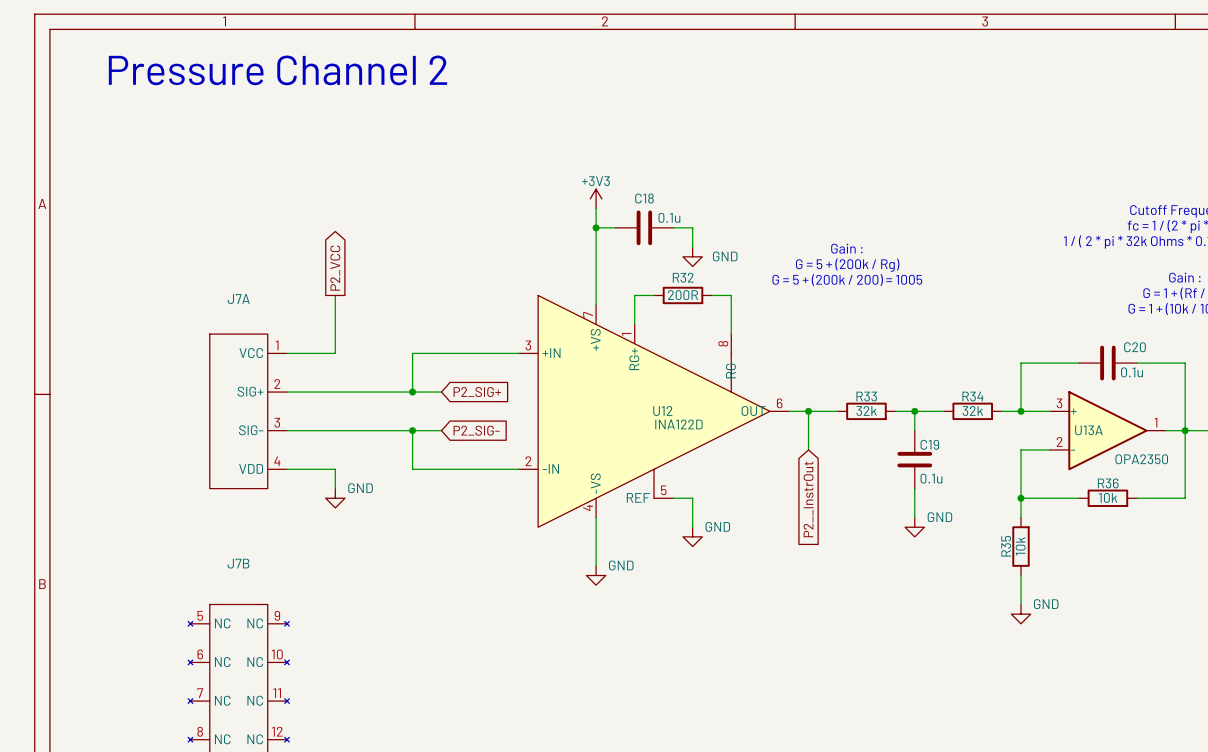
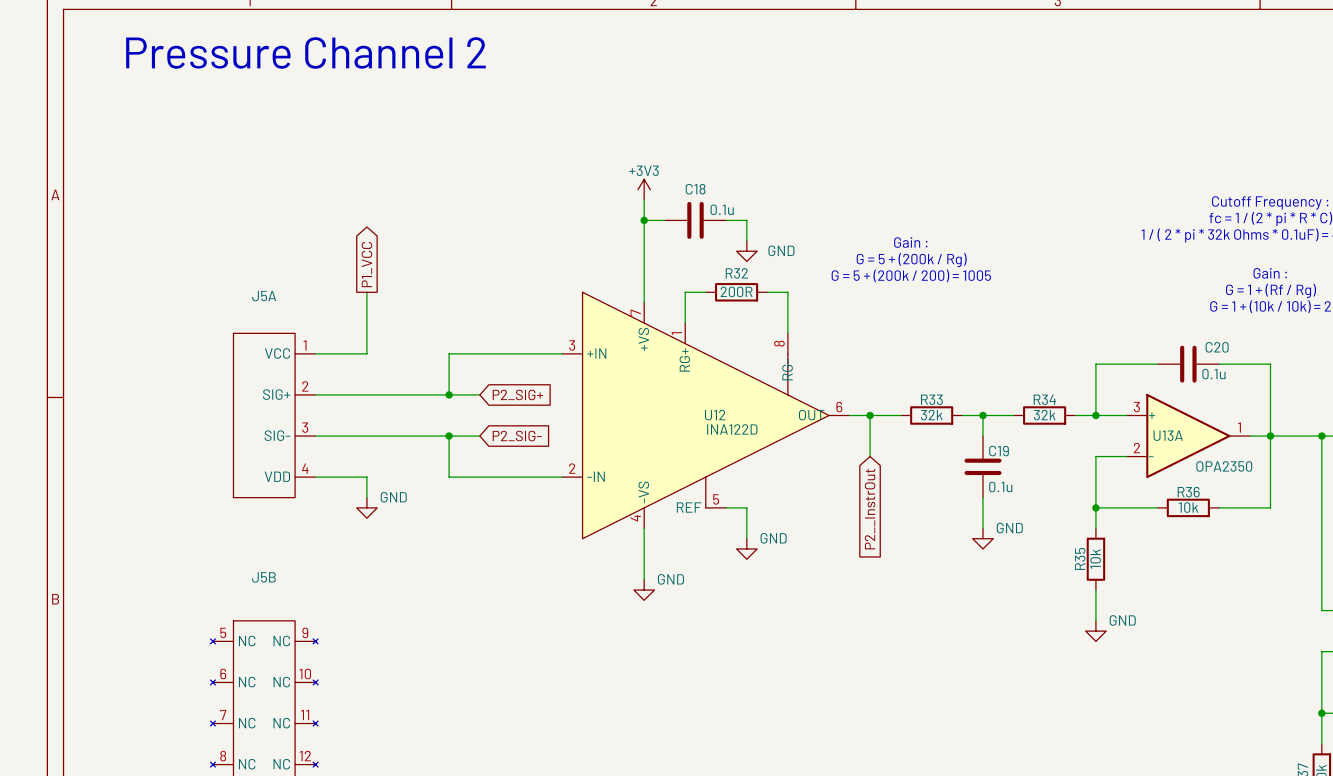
global label: P2_VCC (335, 268) -> P1_VCC (366, 264)
J7A name: J7A (238, 299) -> J5A (264, 296)
J7B name: J7B (238, 563) -> J5B (263, 577)

